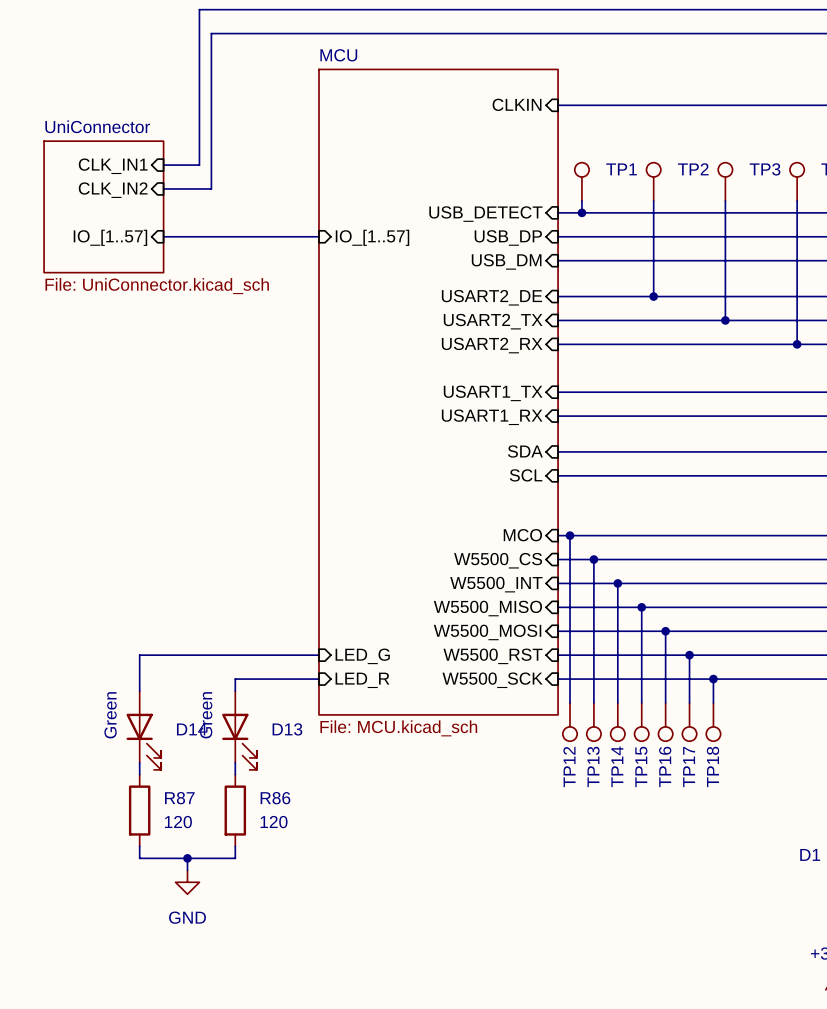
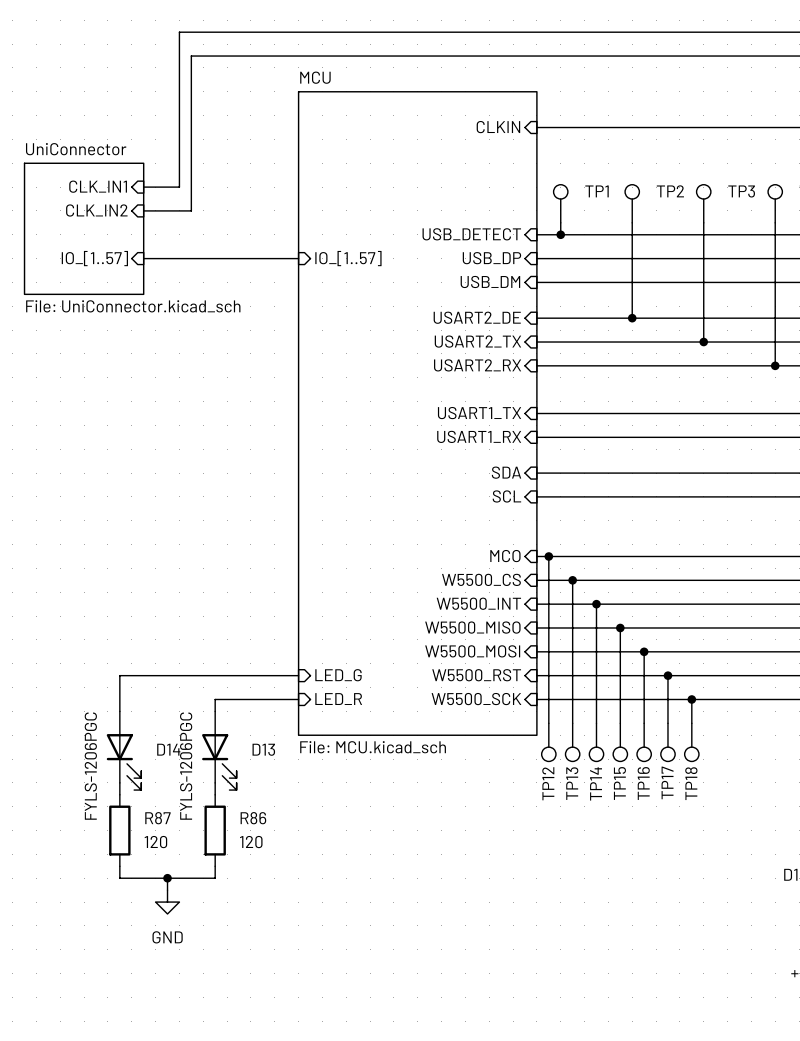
D14 value: Green (110, 715) -> FYLS-1206PGC (90, 766)
D13 value: Green (206, 715) -> FYLS-1206PGC (186, 766)

